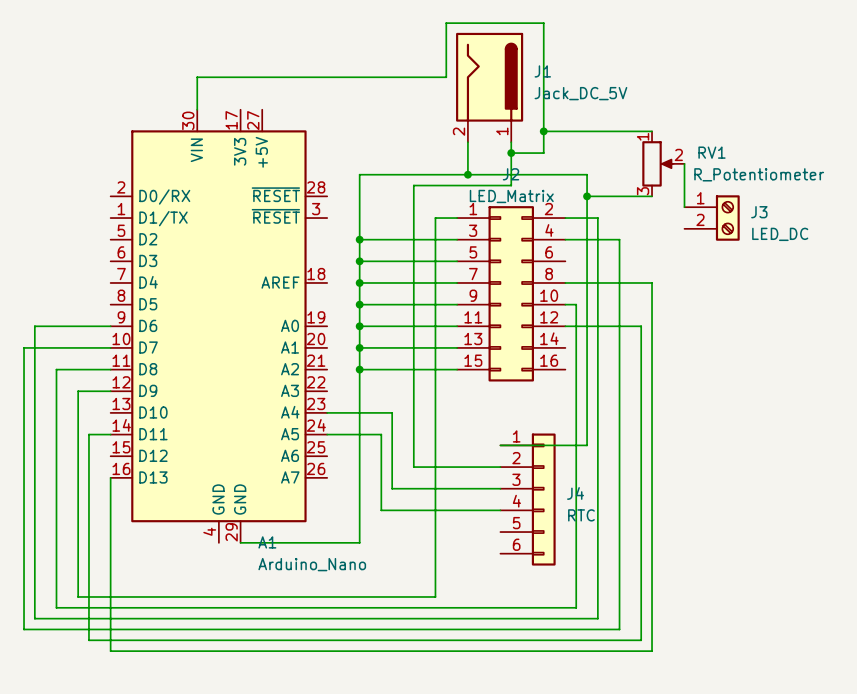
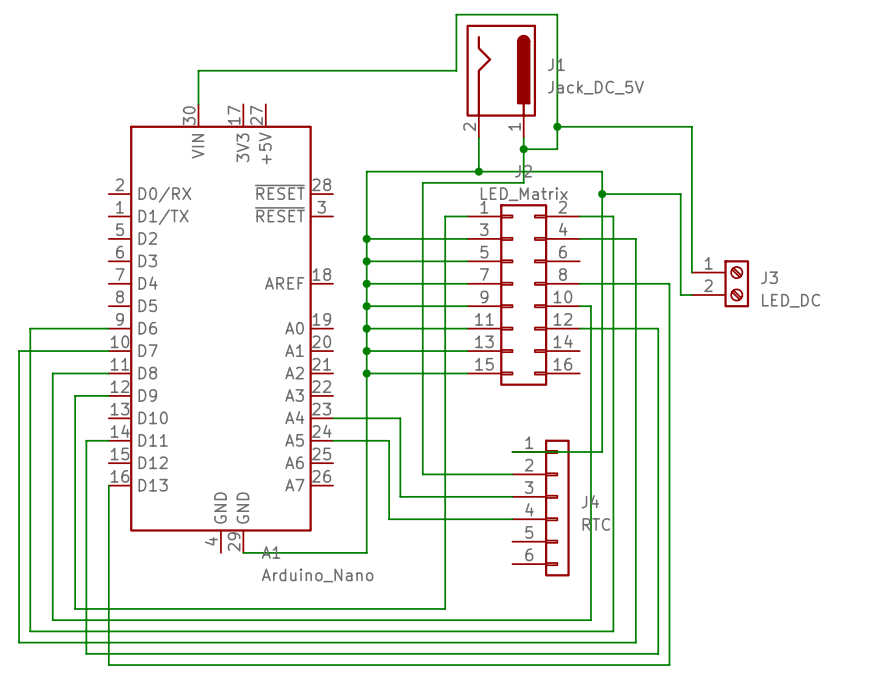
wire: none -> (669, 126) (691, 126) (691, 272)
RV1: R_Potentiometer (663, 163) -> none
wire: (684, 163) (684, 207) -> none
wire: none -> (669, 194) (680, 194) (680, 294) (691, 294)
J3 position: (712, 218) -> (720, 283)

